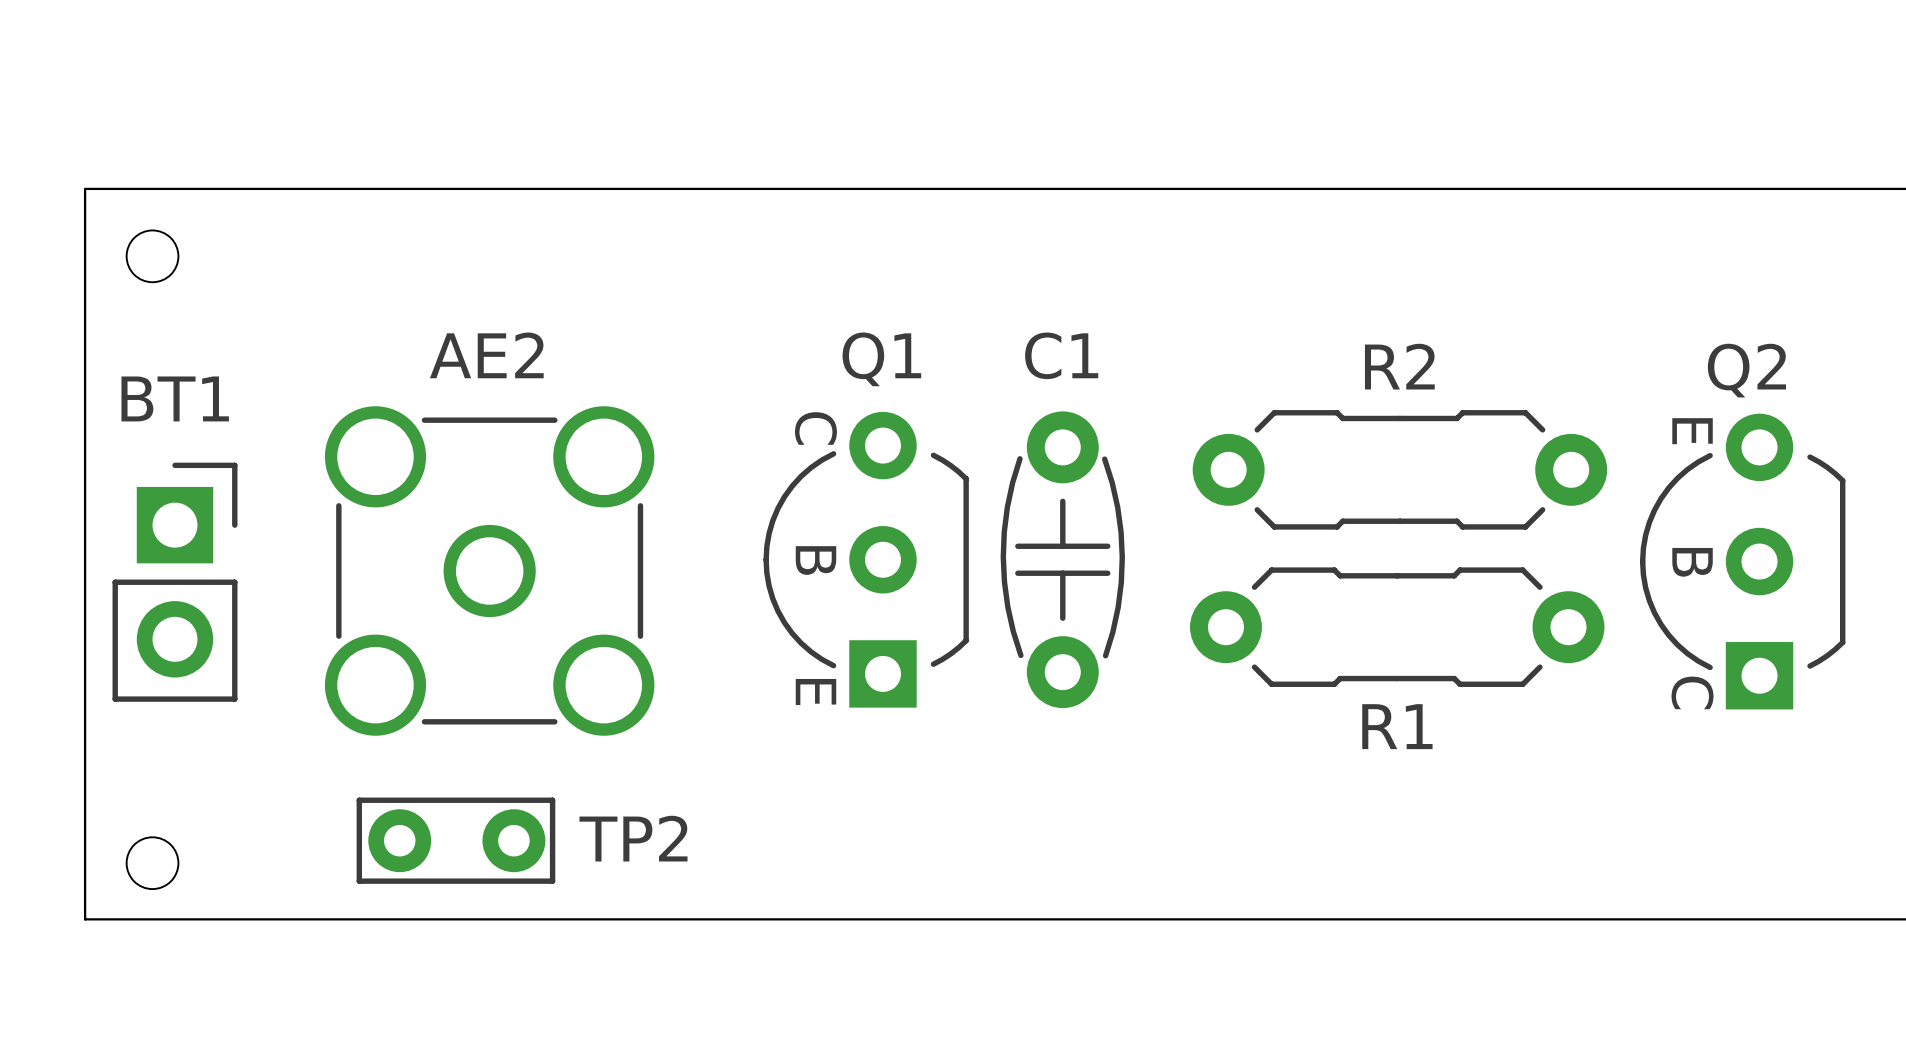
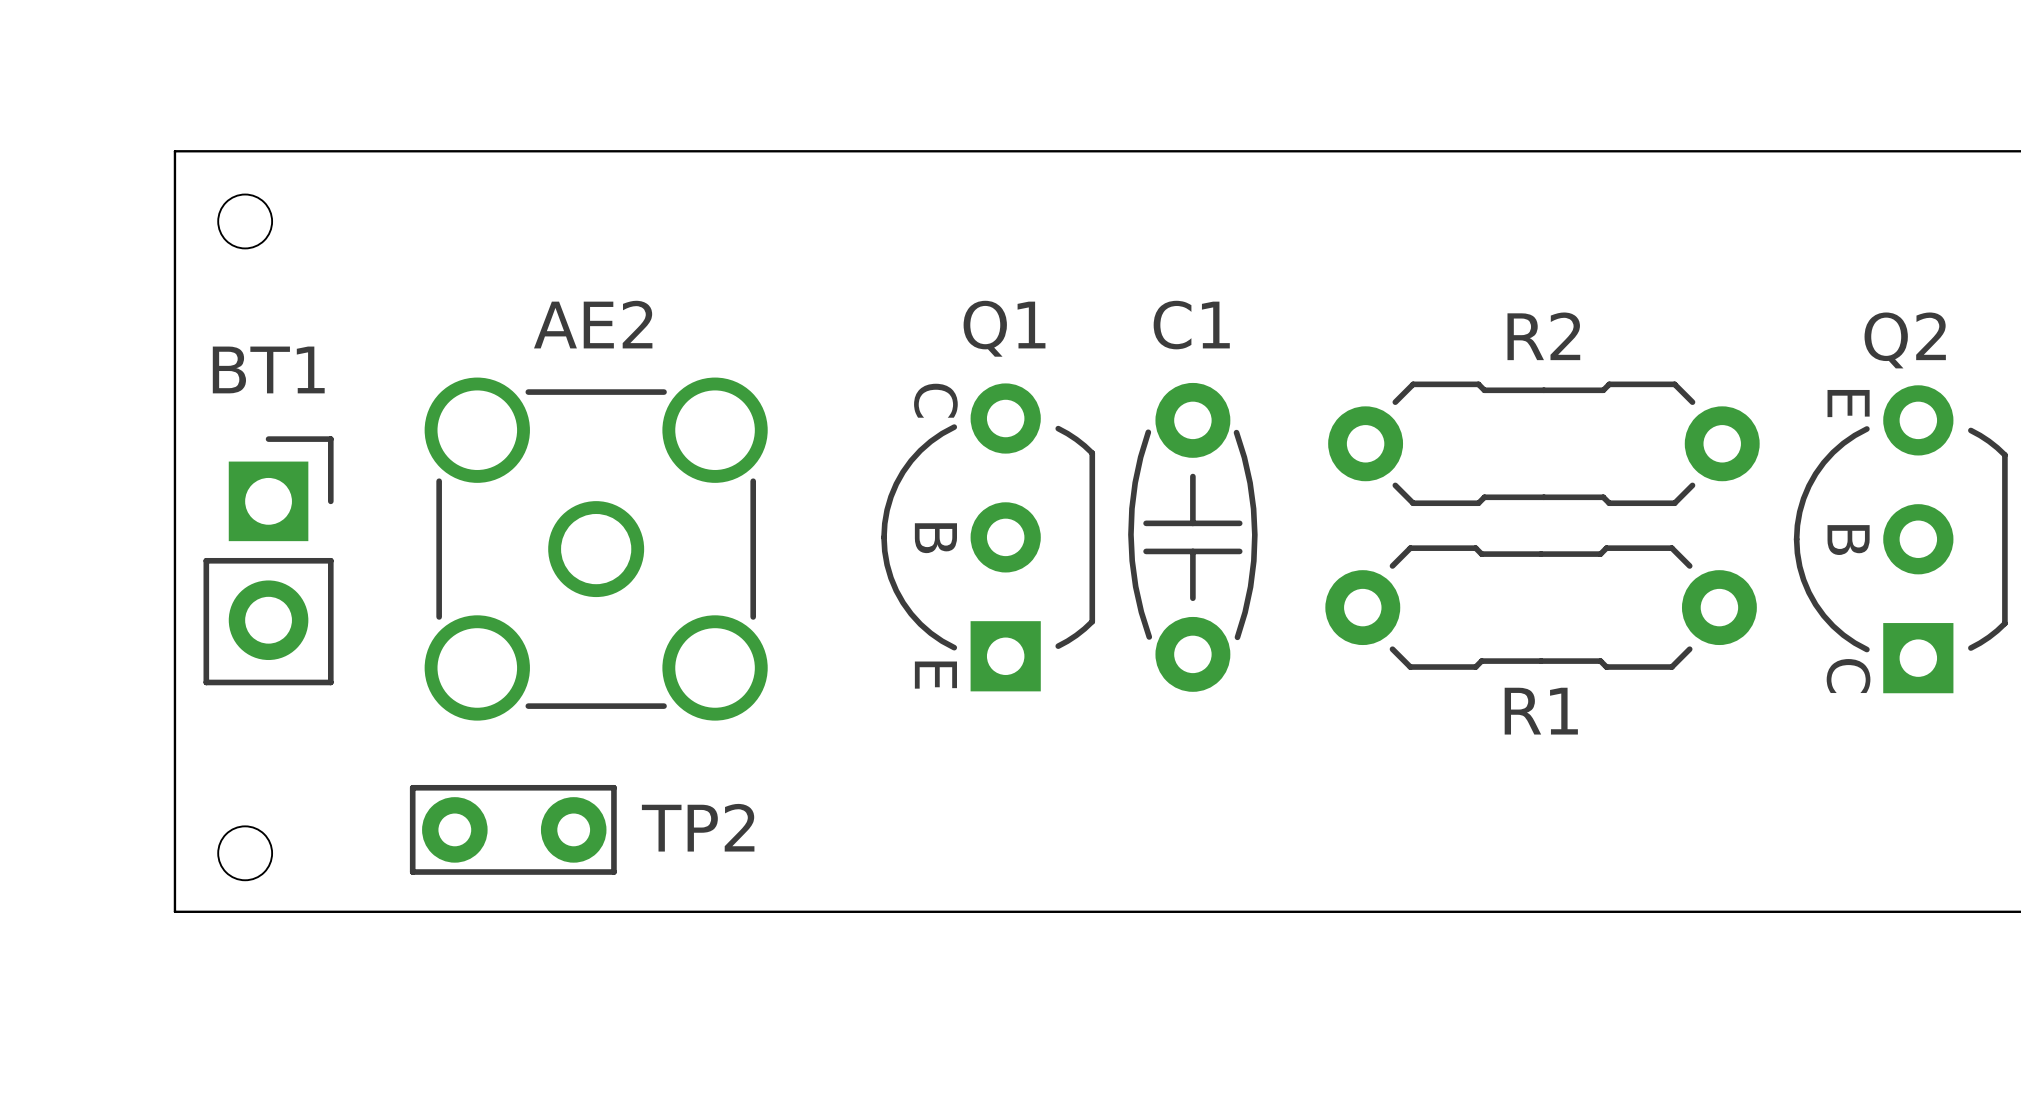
TP2 position: (455, 840) -> (513, 829)

